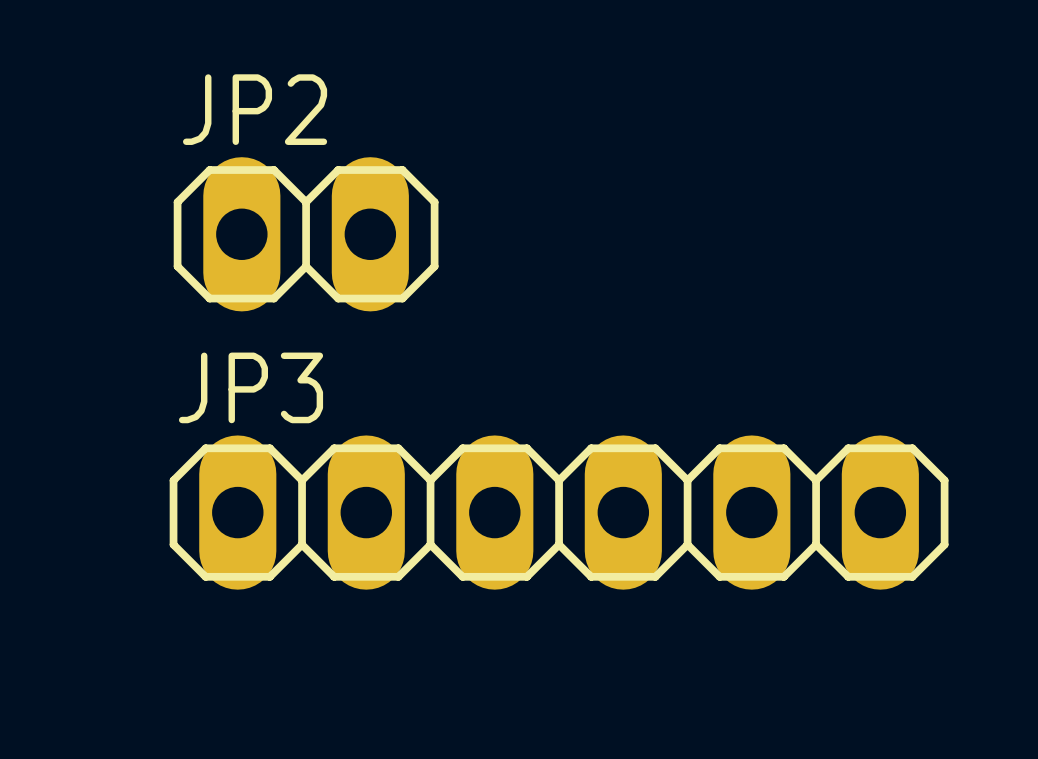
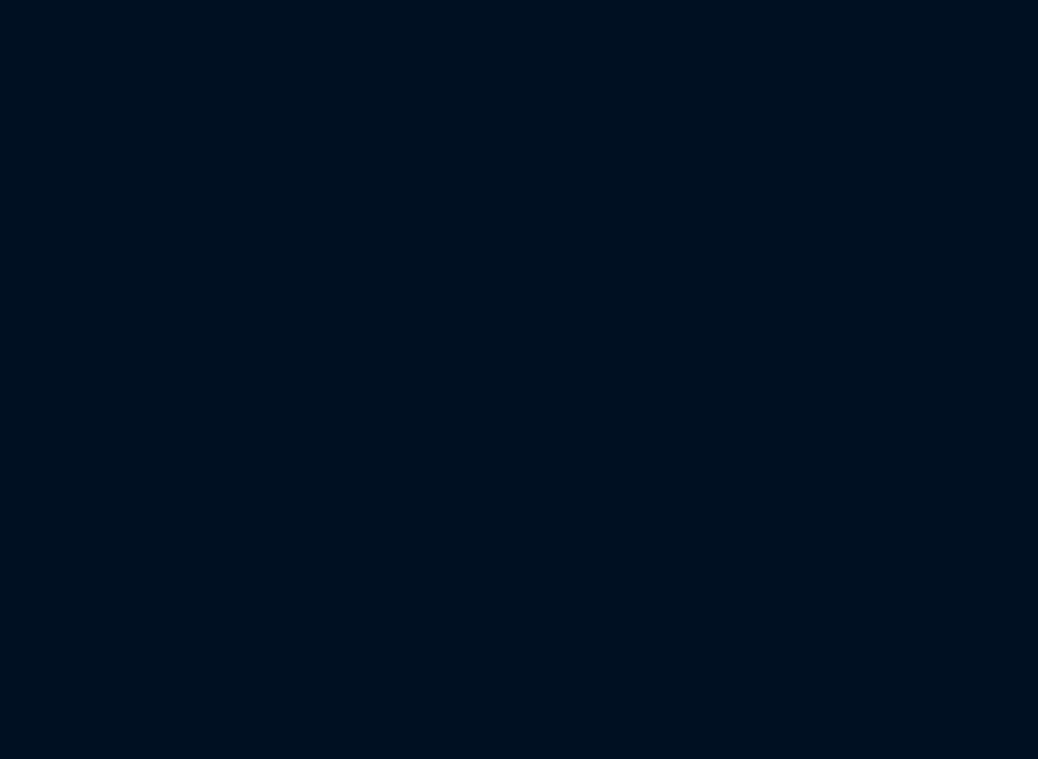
JP2: (306, 234) -> none
JP3: (559, 512) -> none

